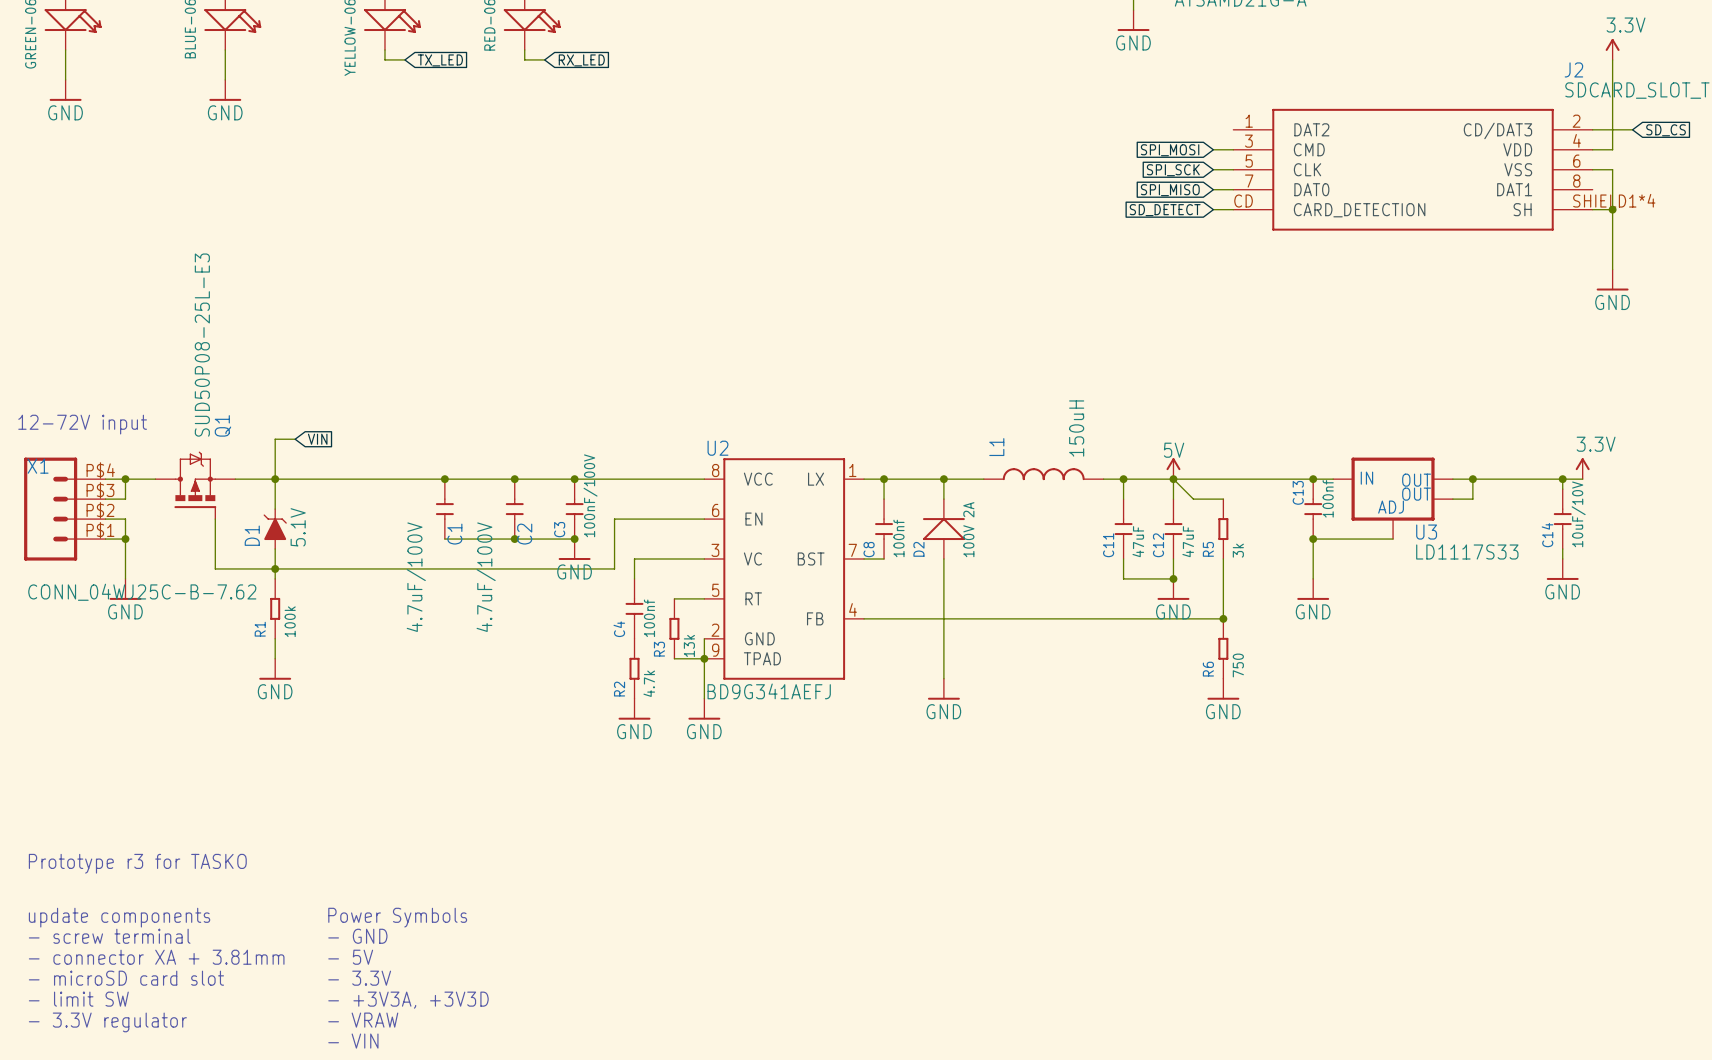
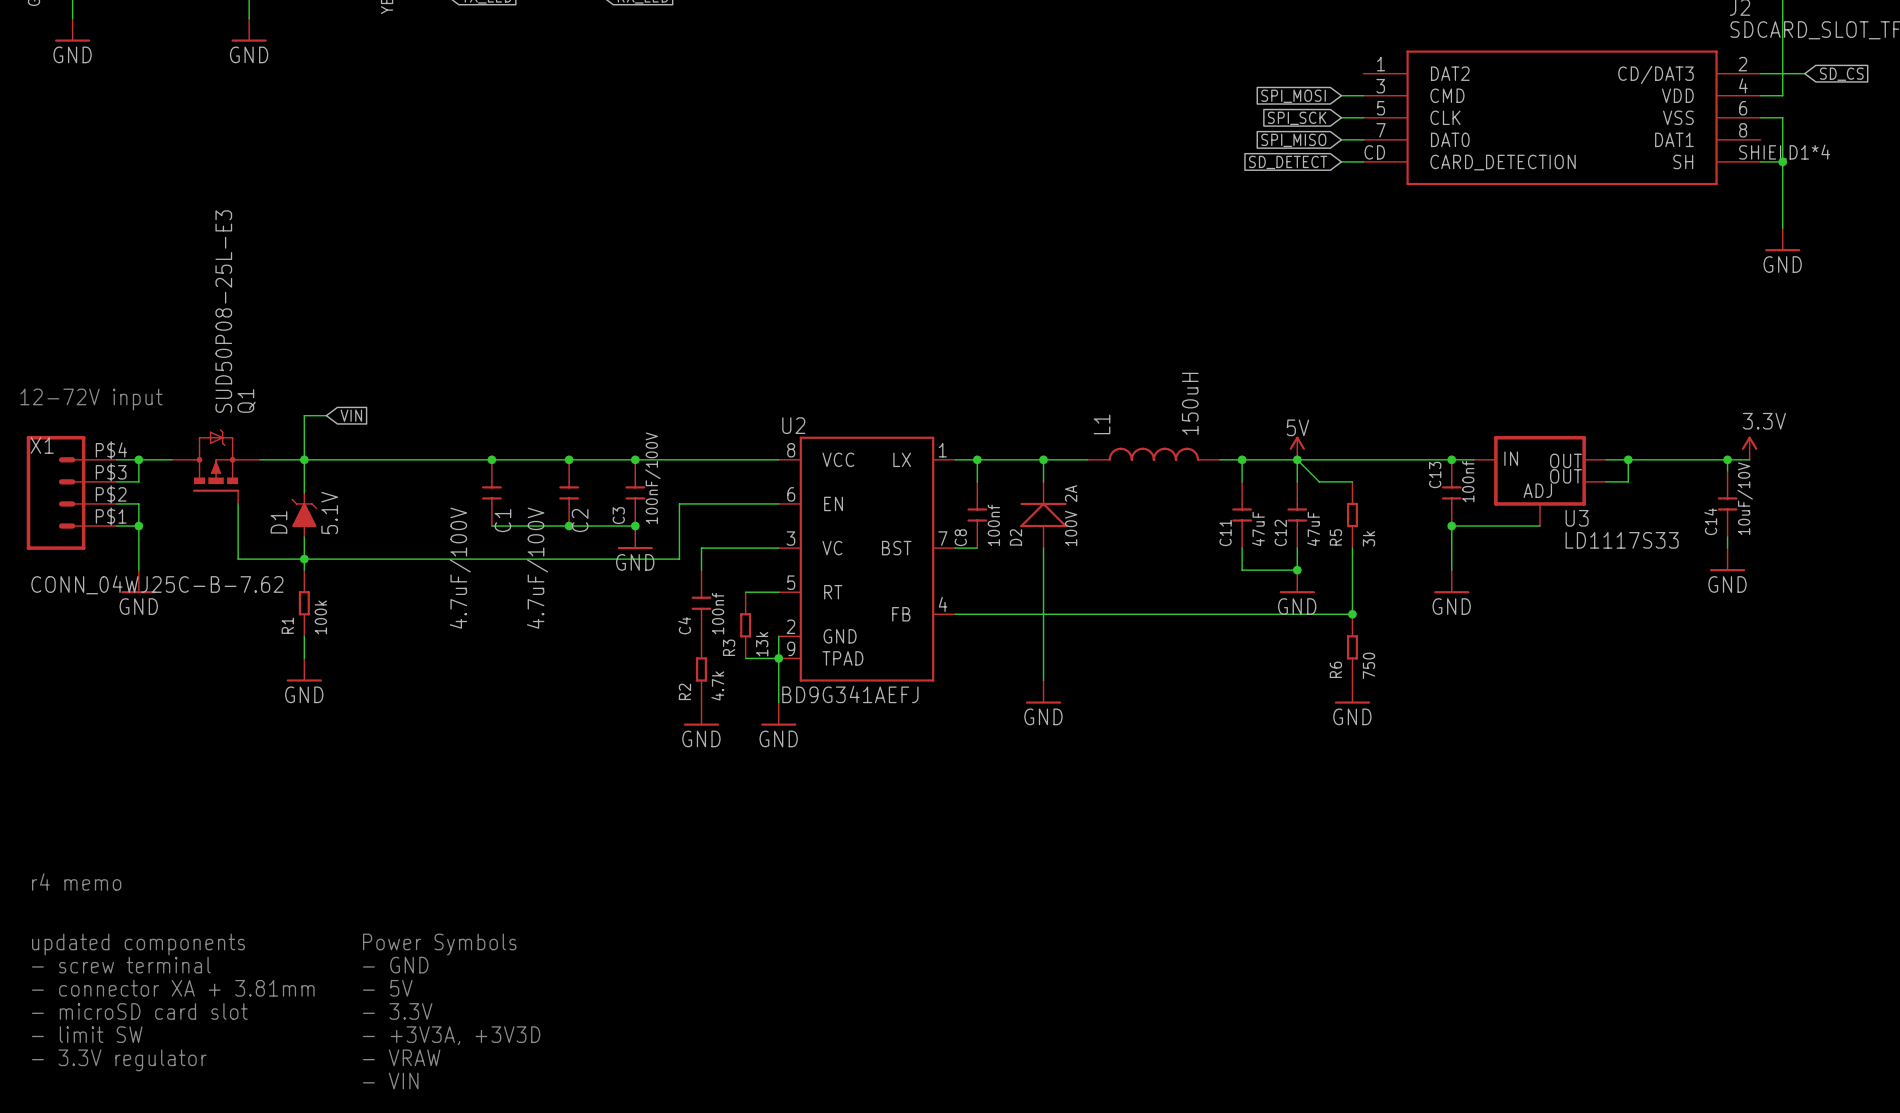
text: Prototype r3 for TASKO (137, 863) -> r4 memo (76, 882)
text: update components (119, 917) -> updated components (138, 944)

